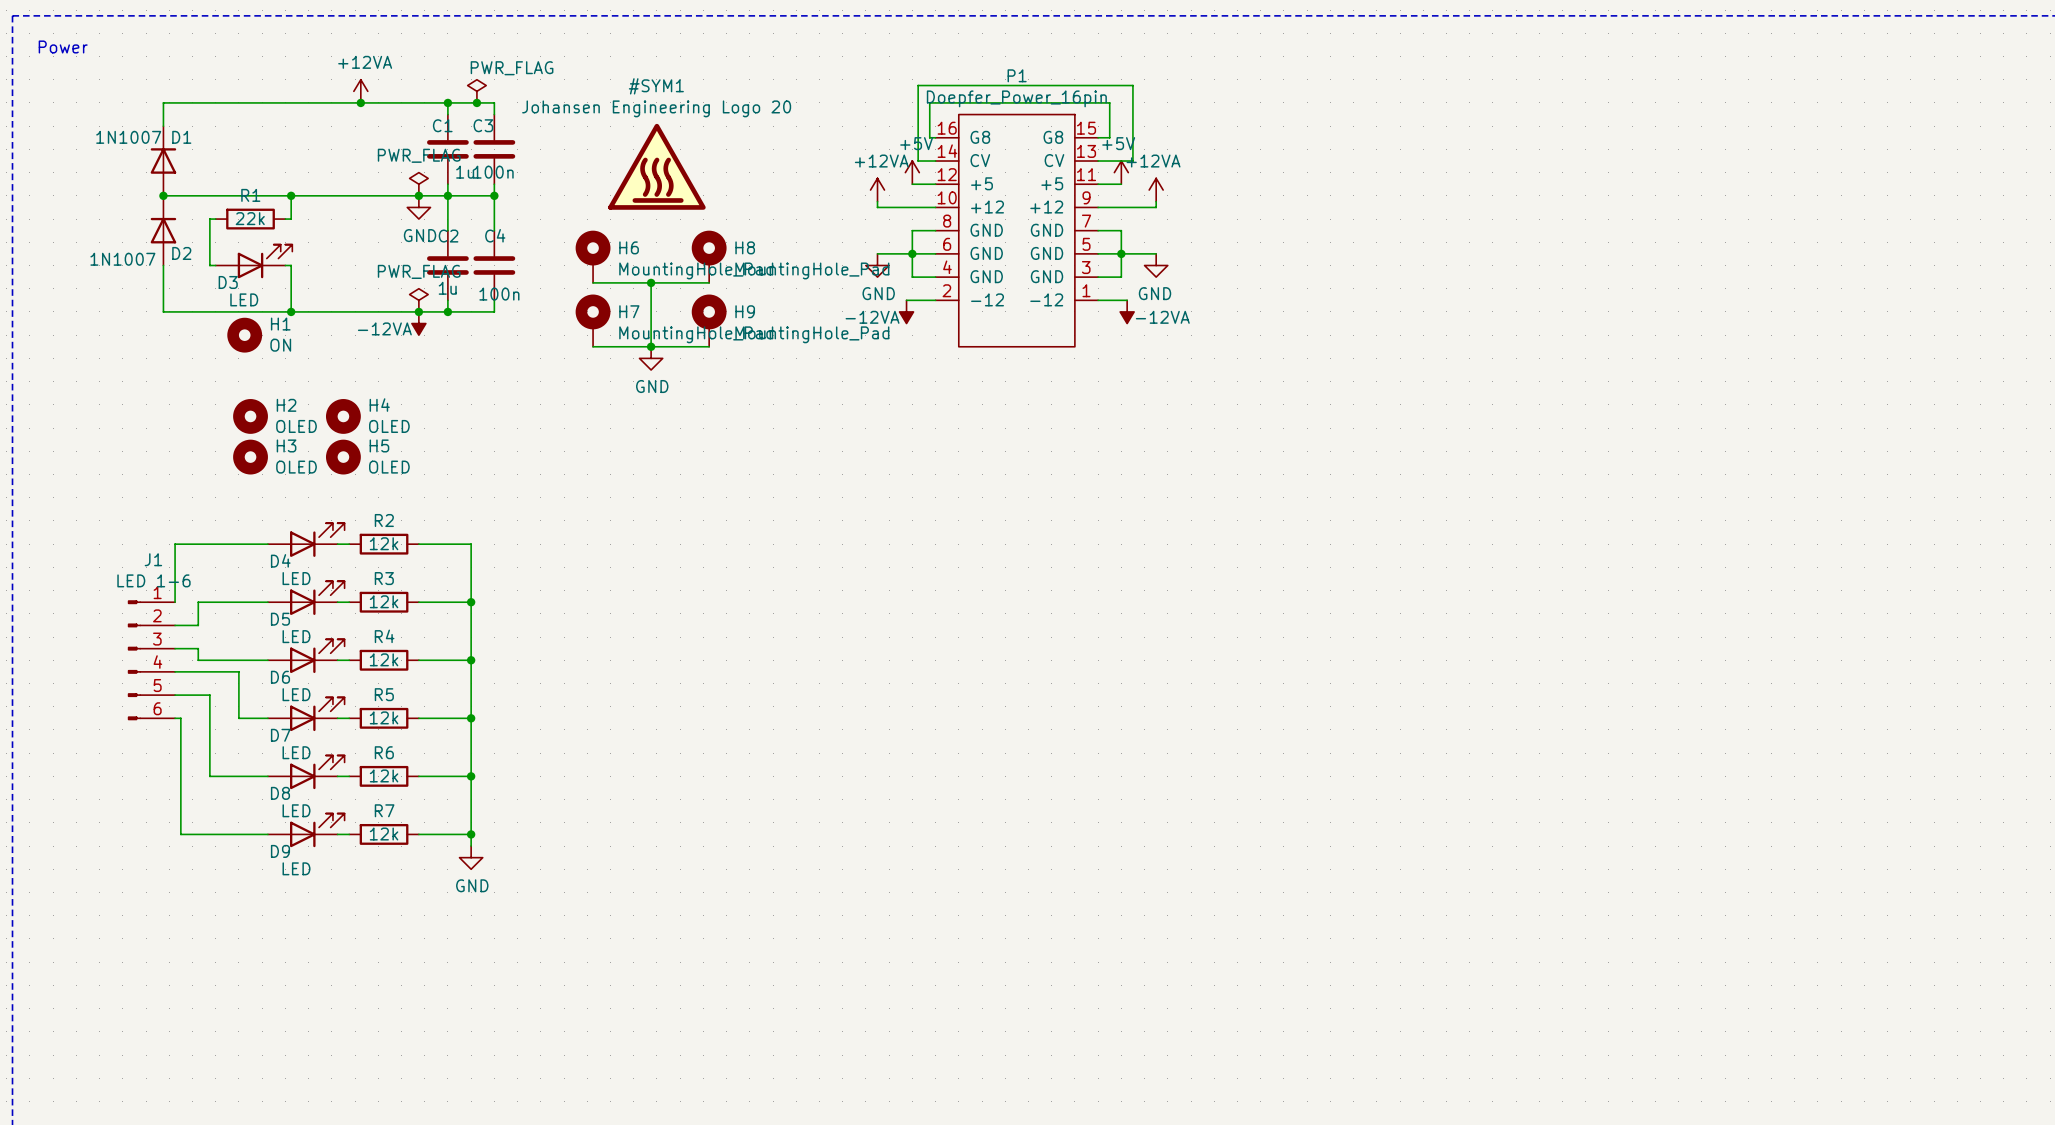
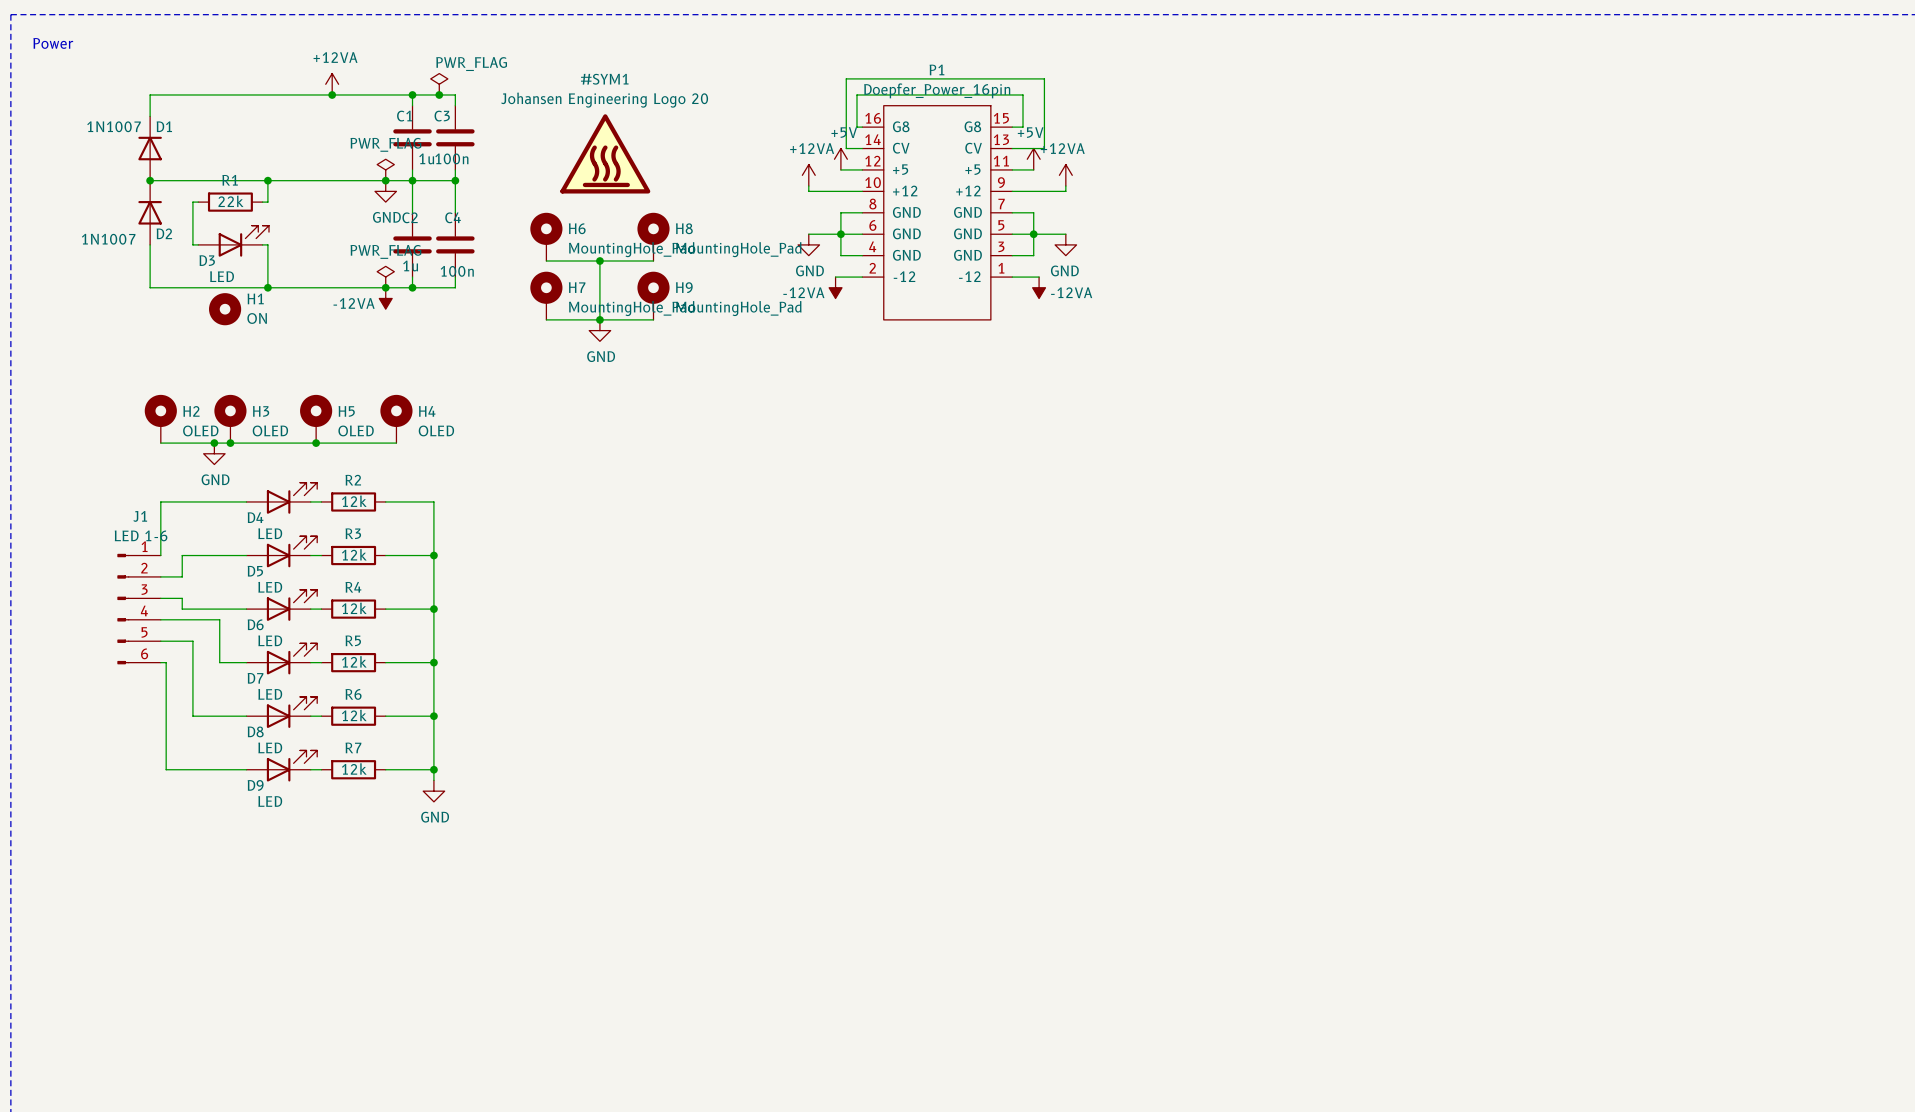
H2 symbol: [233, 399, 268, 434] -> [144, 394, 177, 444]
H4 symbol: [325, 399, 361, 434] -> [380, 394, 413, 444]
H3 symbol: [233, 439, 268, 475] -> [214, 394, 247, 444]
H5 symbol: [325, 439, 361, 475] -> [300, 394, 333, 444]
wire: none -> (160, 443) (396, 443)
junction: none -> (214, 443)
junction: none -> (230, 443)
junction: none -> (316, 443)
power symbol: none -> GND (214, 453)

